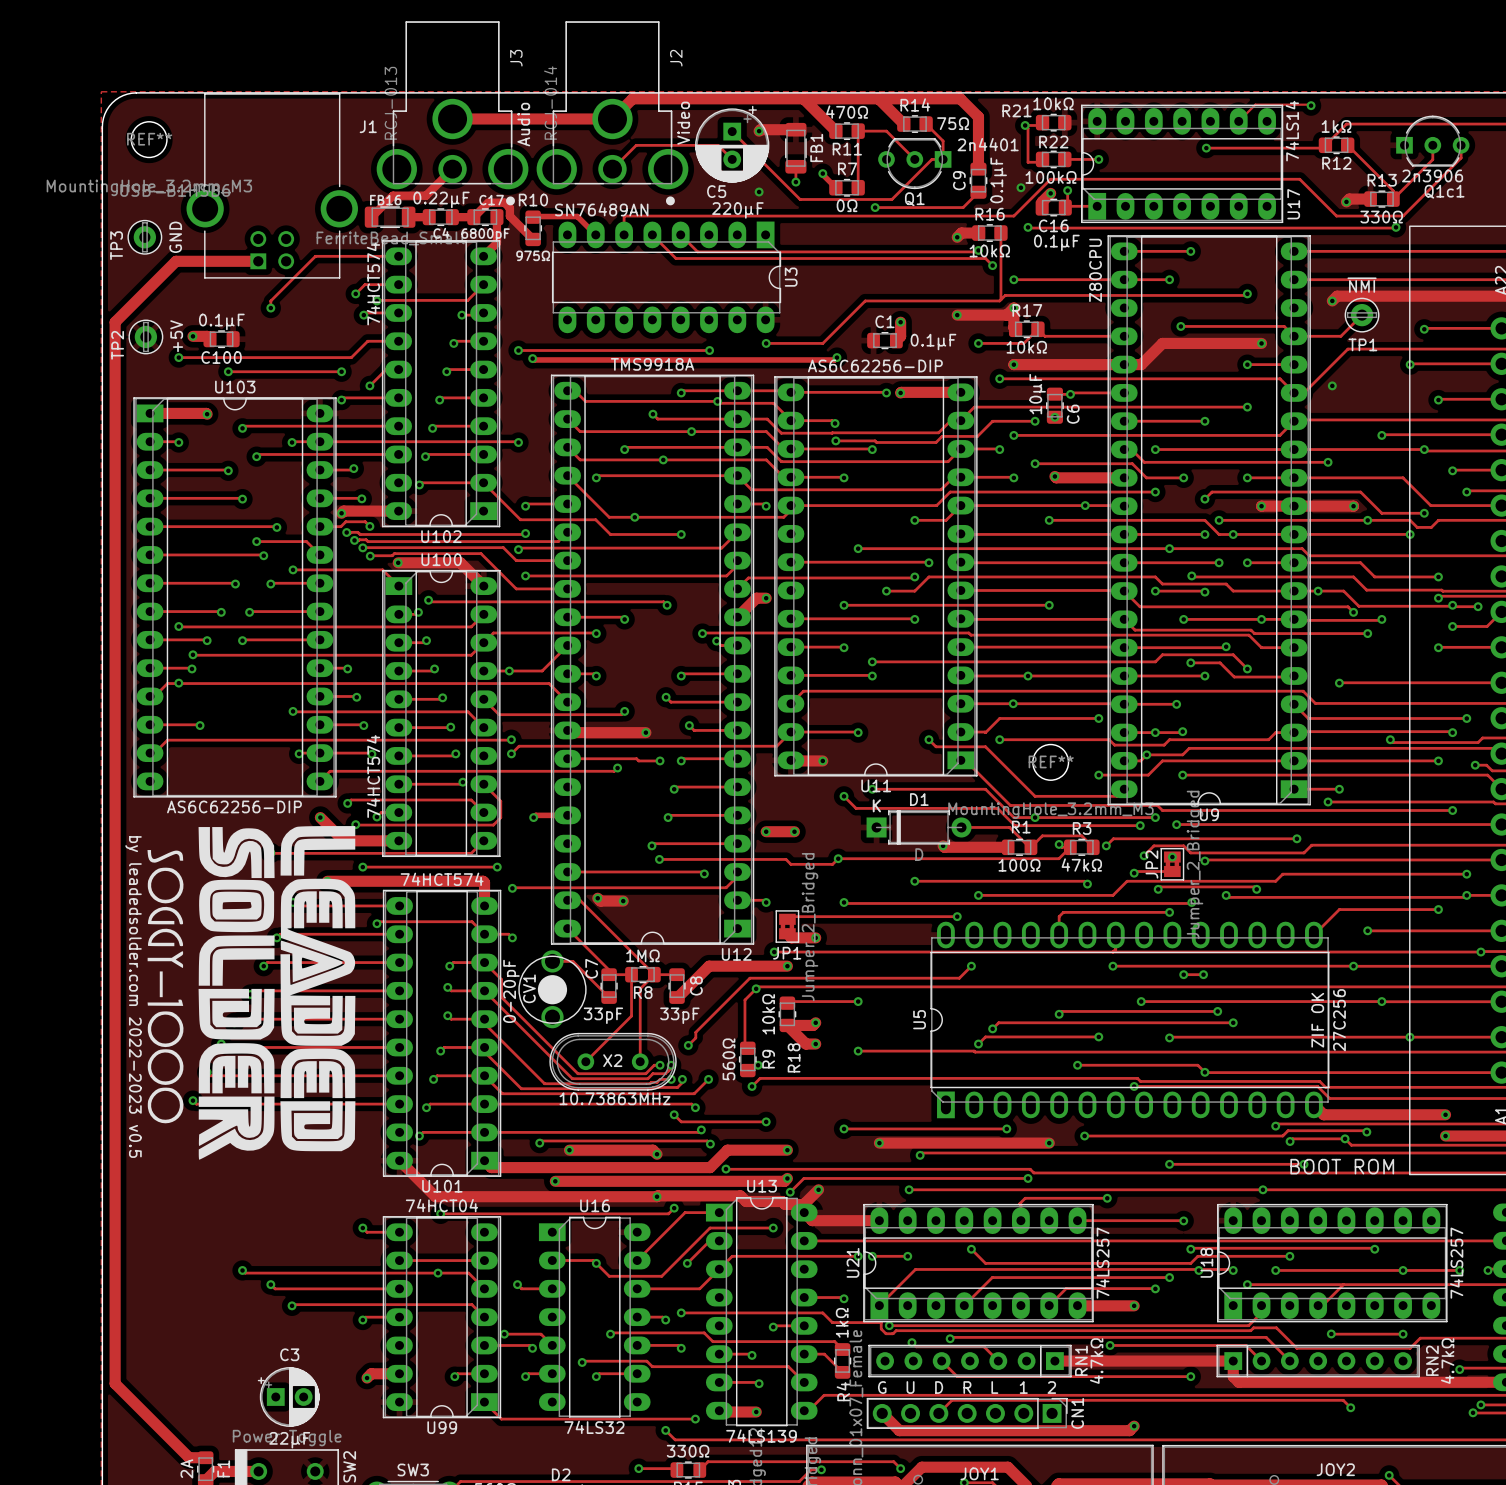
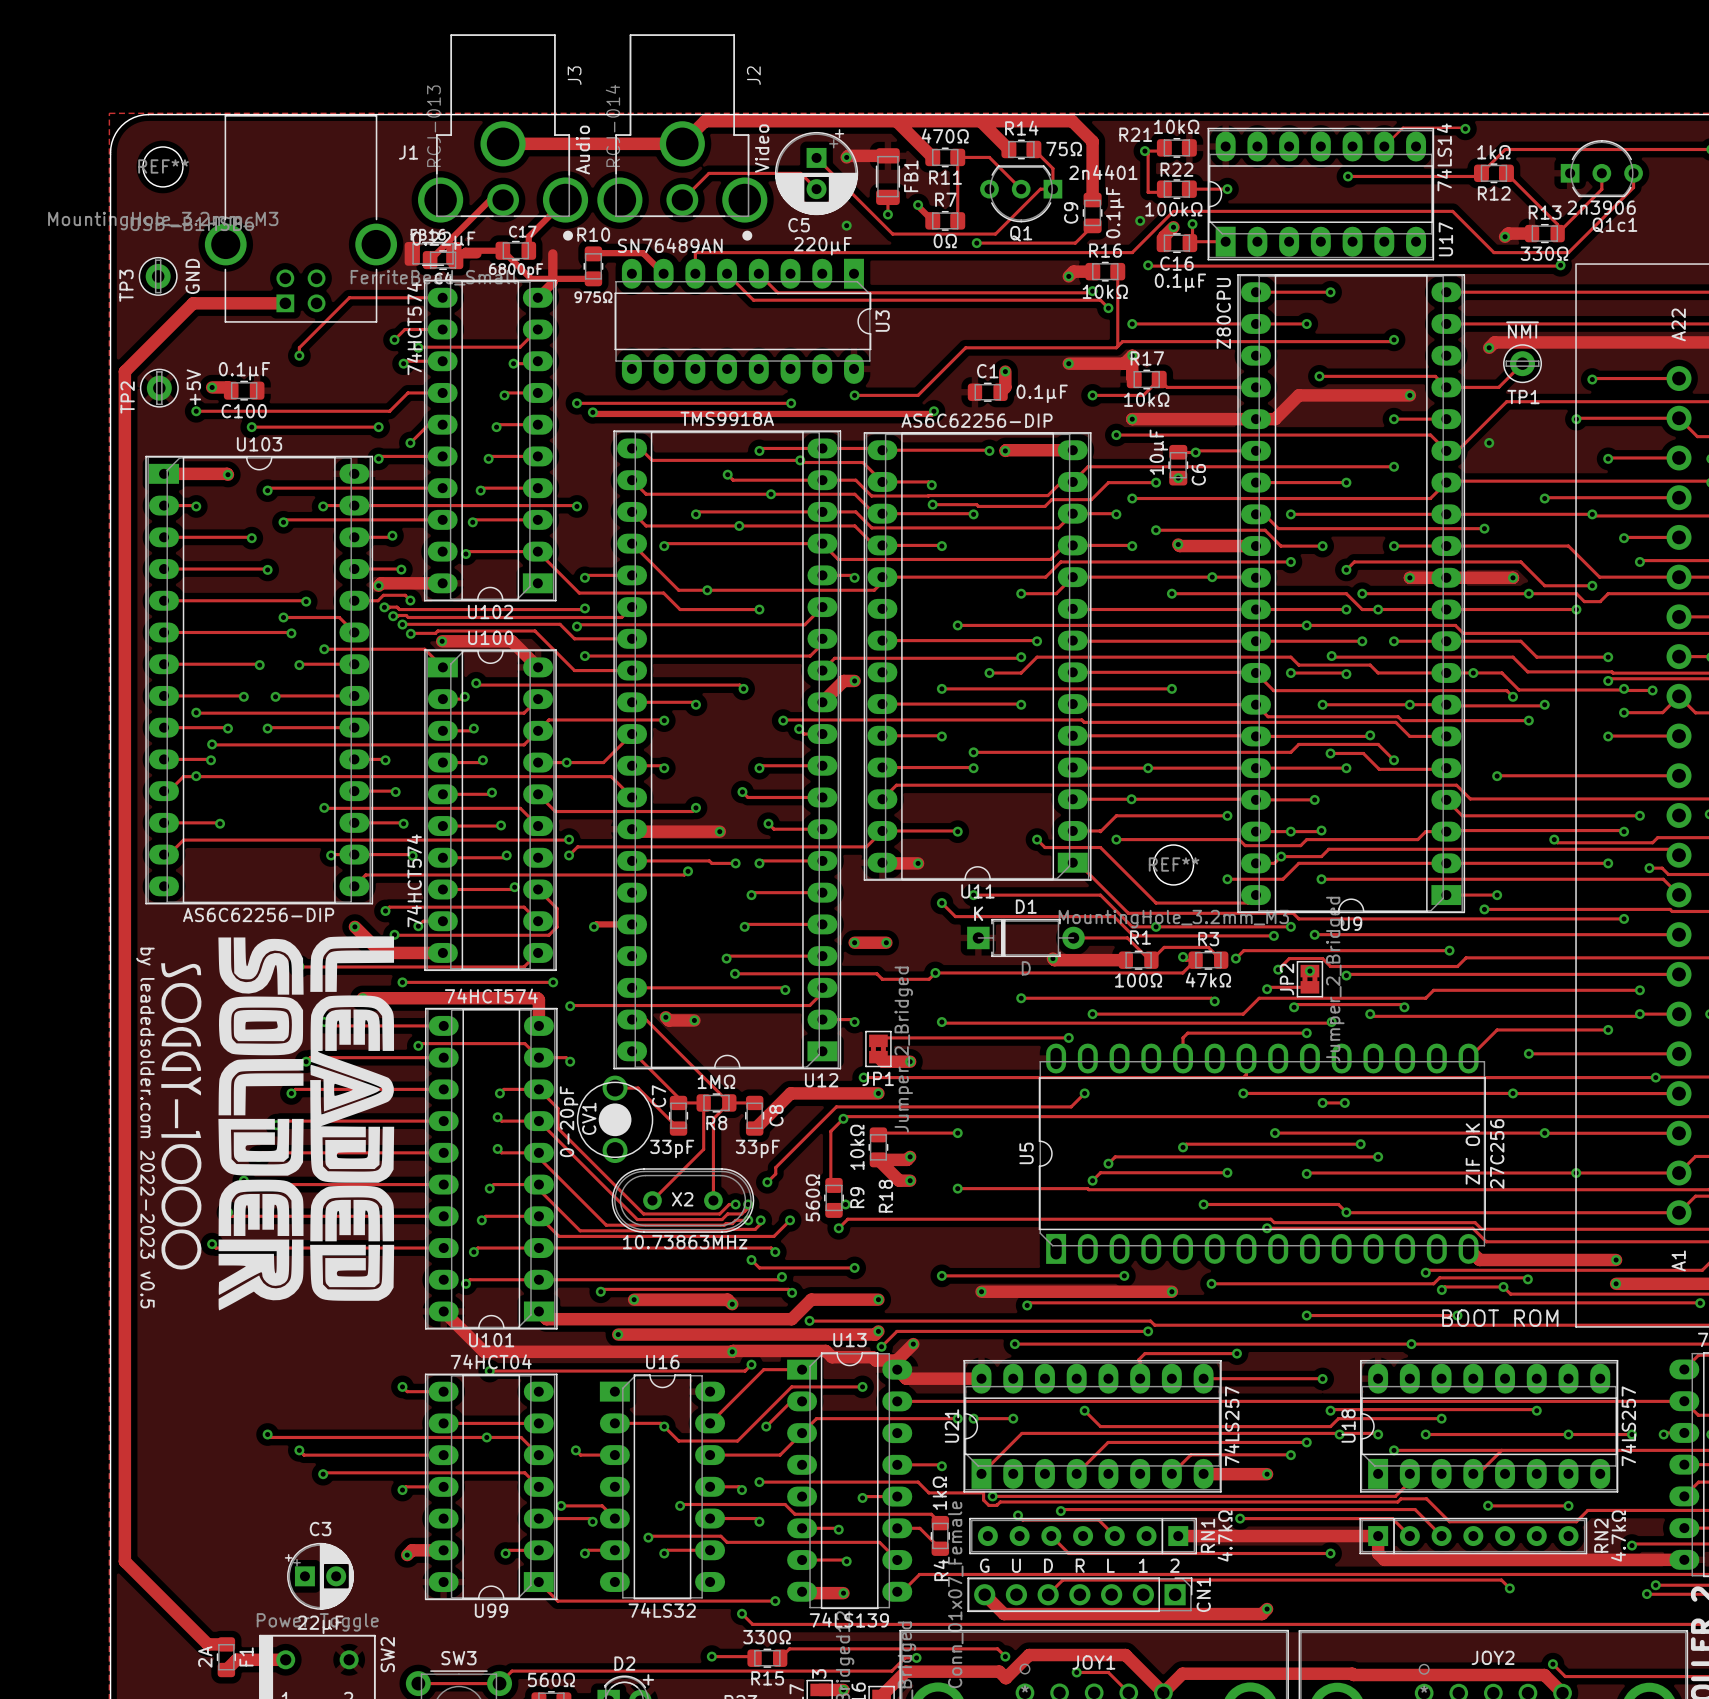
track: (452, 169) (425, 195) (393, 195) (371, 217) -> (503, 200) (490, 200) (430, 260)
track: none -> (565, 200) (528, 236) (528, 250)
C4 position: (440, 217) -> (443, 260)
track: (452, 217) (473, 217) (488, 202) (504, 202) (509, 208) (509, 216) (533, 239) -> (456, 260) (465, 250) (502, 250) (530, 278) (593, 278)
C17 position: (485, 217) -> (515, 250)

